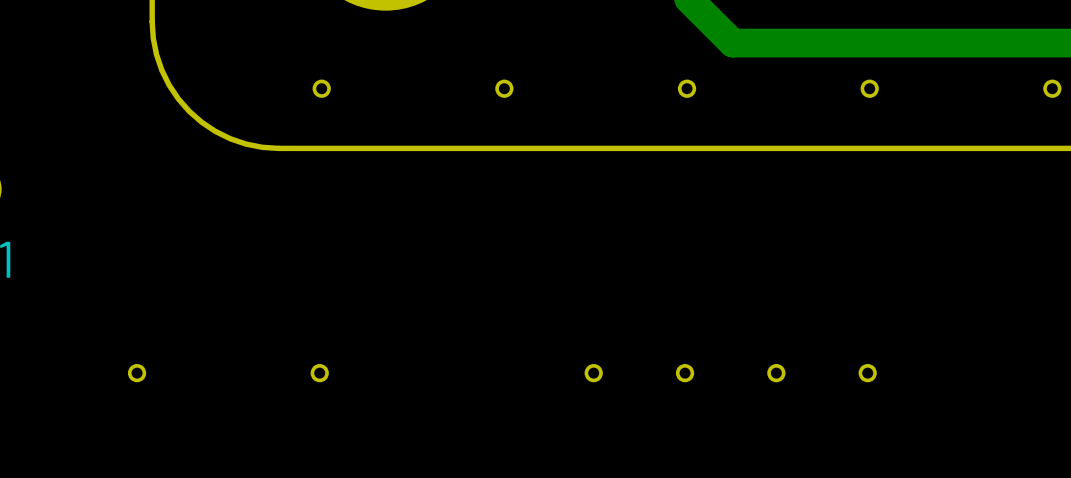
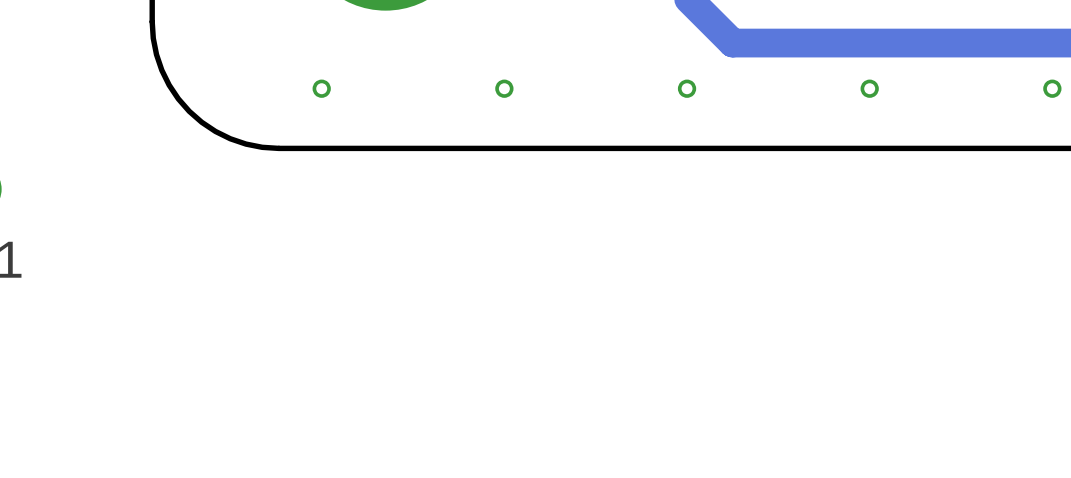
part: (137, 373) -> none
part: (319, 373) -> none
part: (593, 373) -> none
part: (685, 373) -> none
part: (776, 373) -> none
part: (867, 373) -> none

